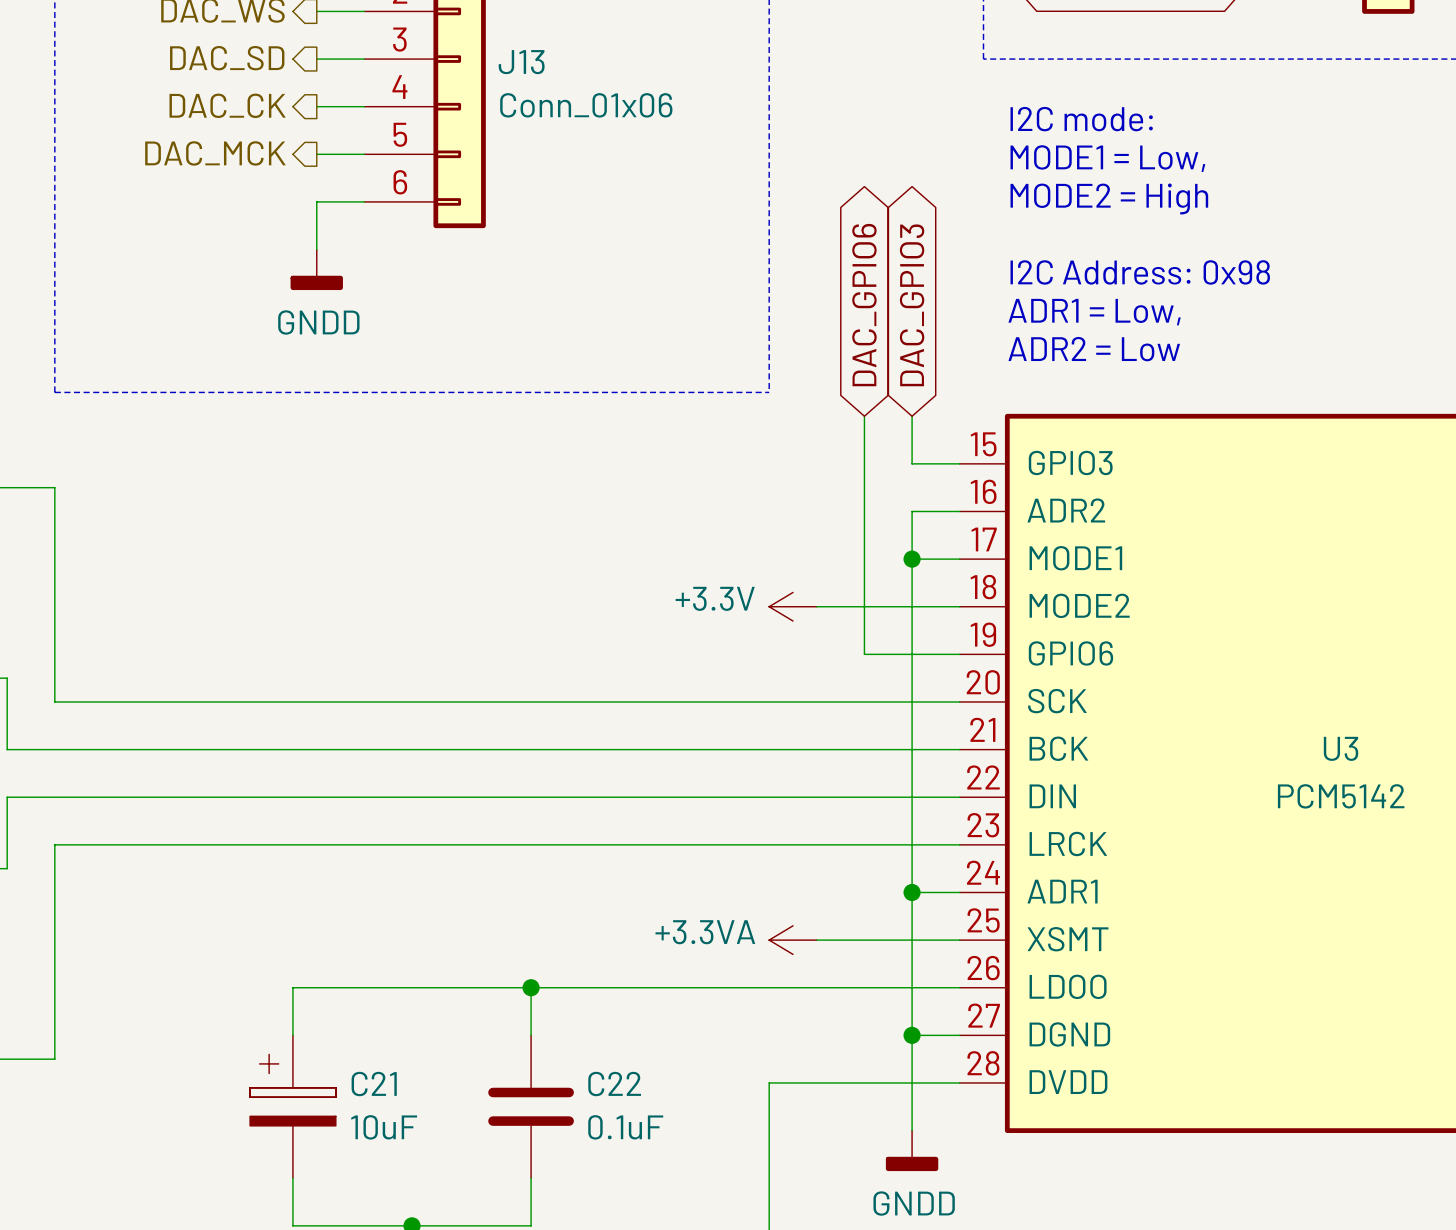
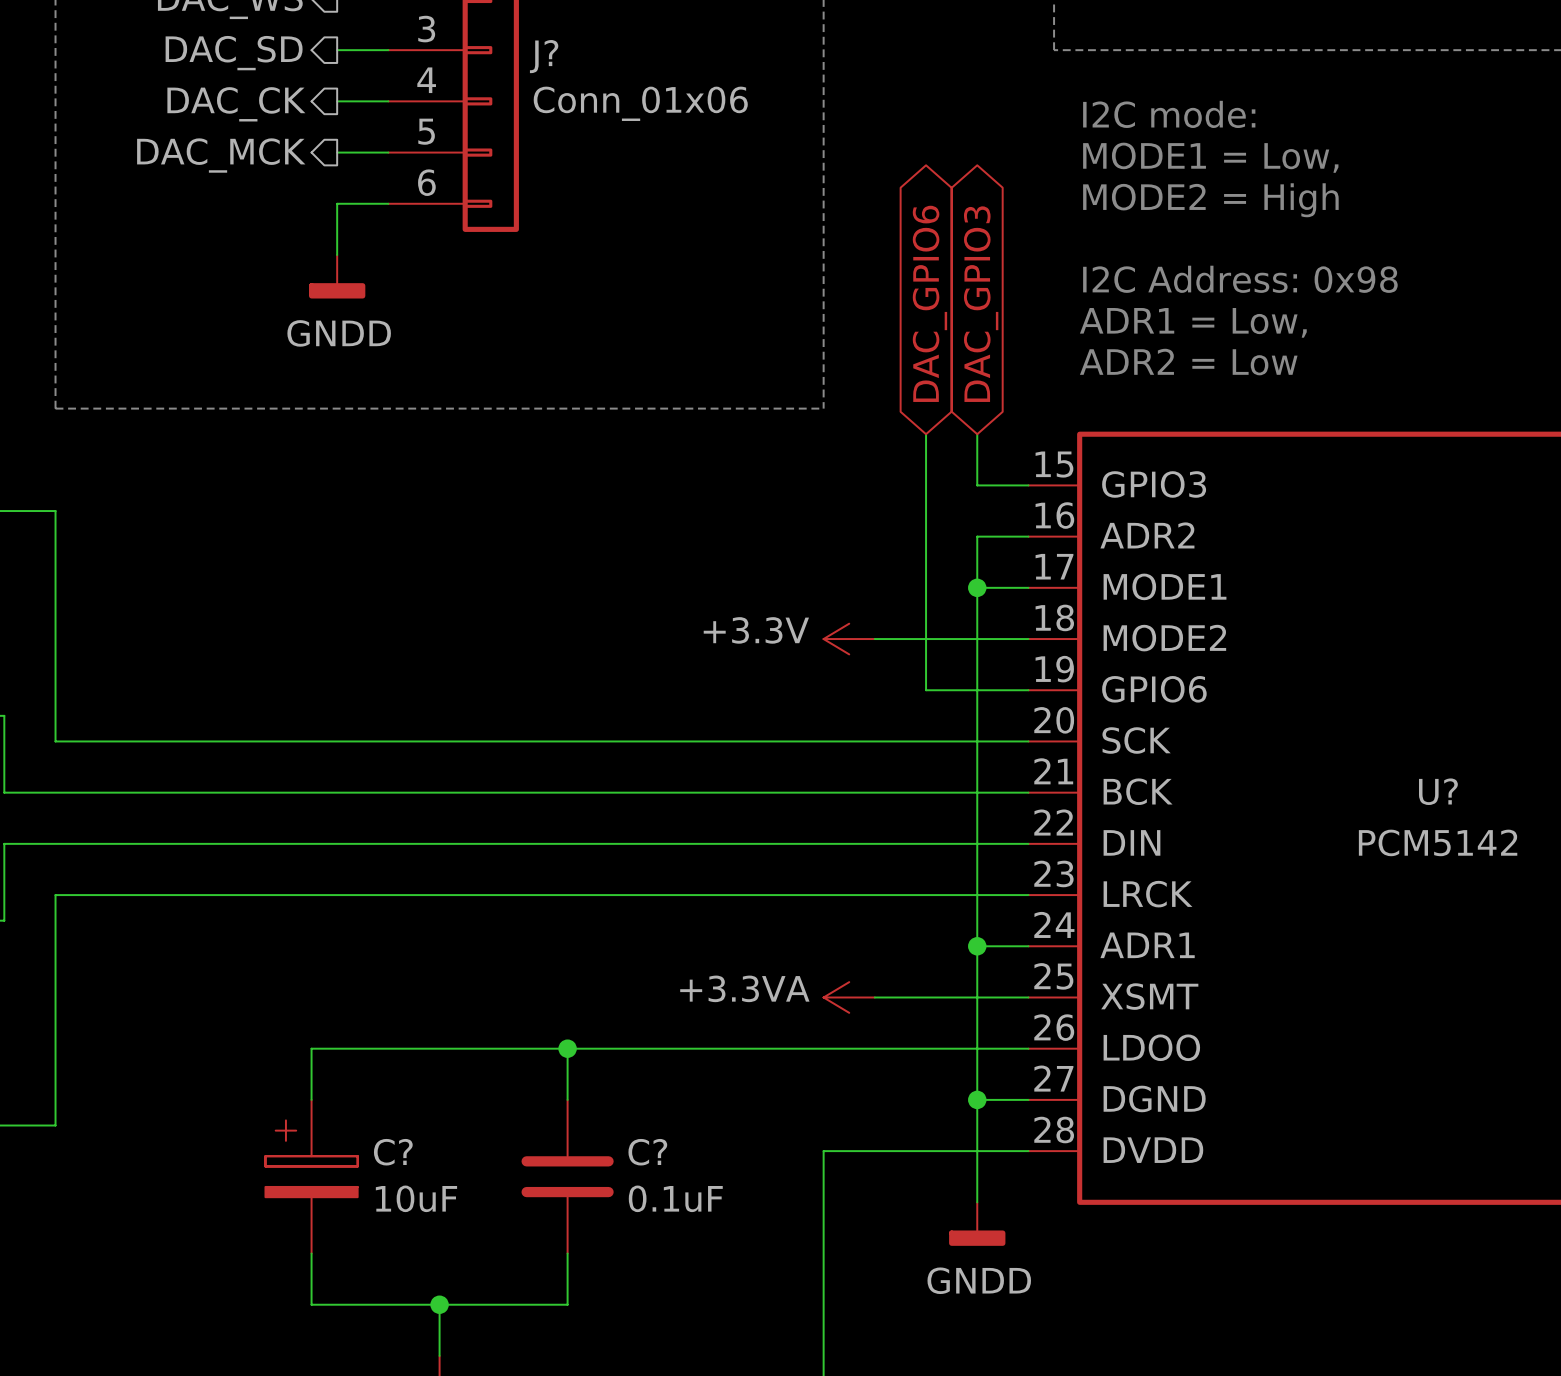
J13 name: J13 (521, 62) -> J? (544, 56)
U3 name: U3 (1341, 748) -> U? (1438, 791)
C21 name: C21 (374, 1084) -> C? (393, 1152)
C22 name: C22 (614, 1084) -> C? (647, 1152)

